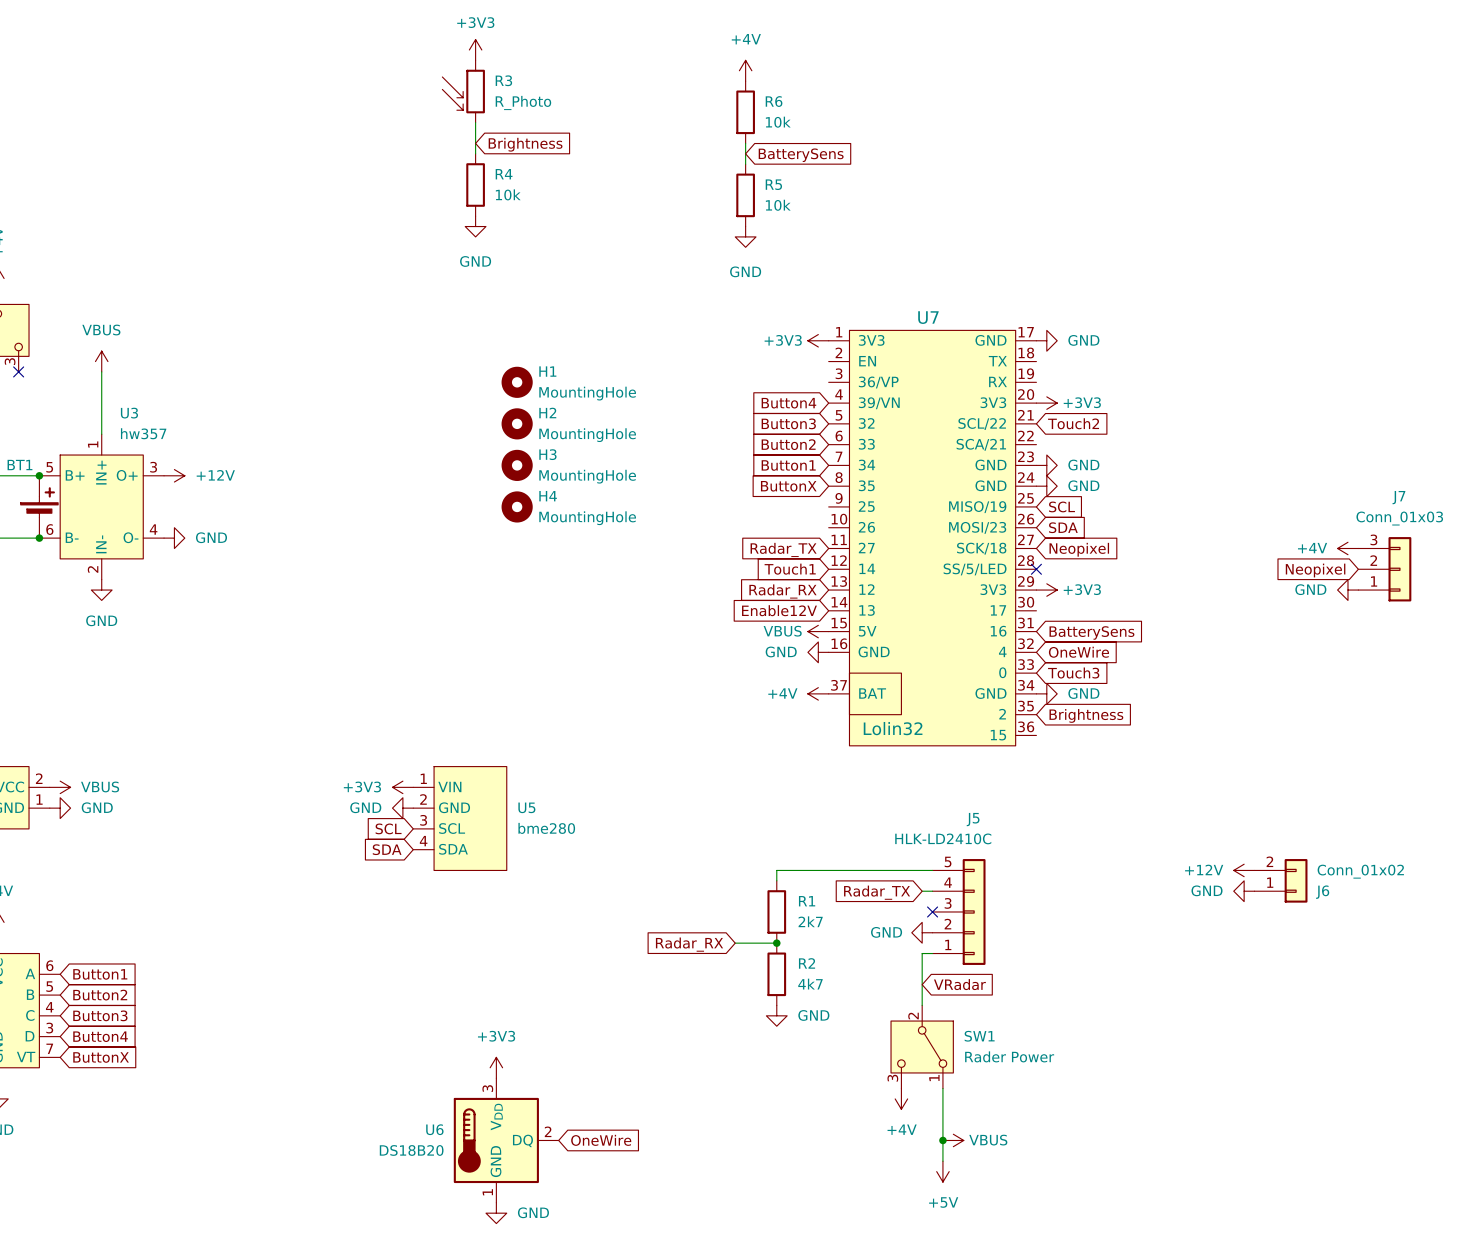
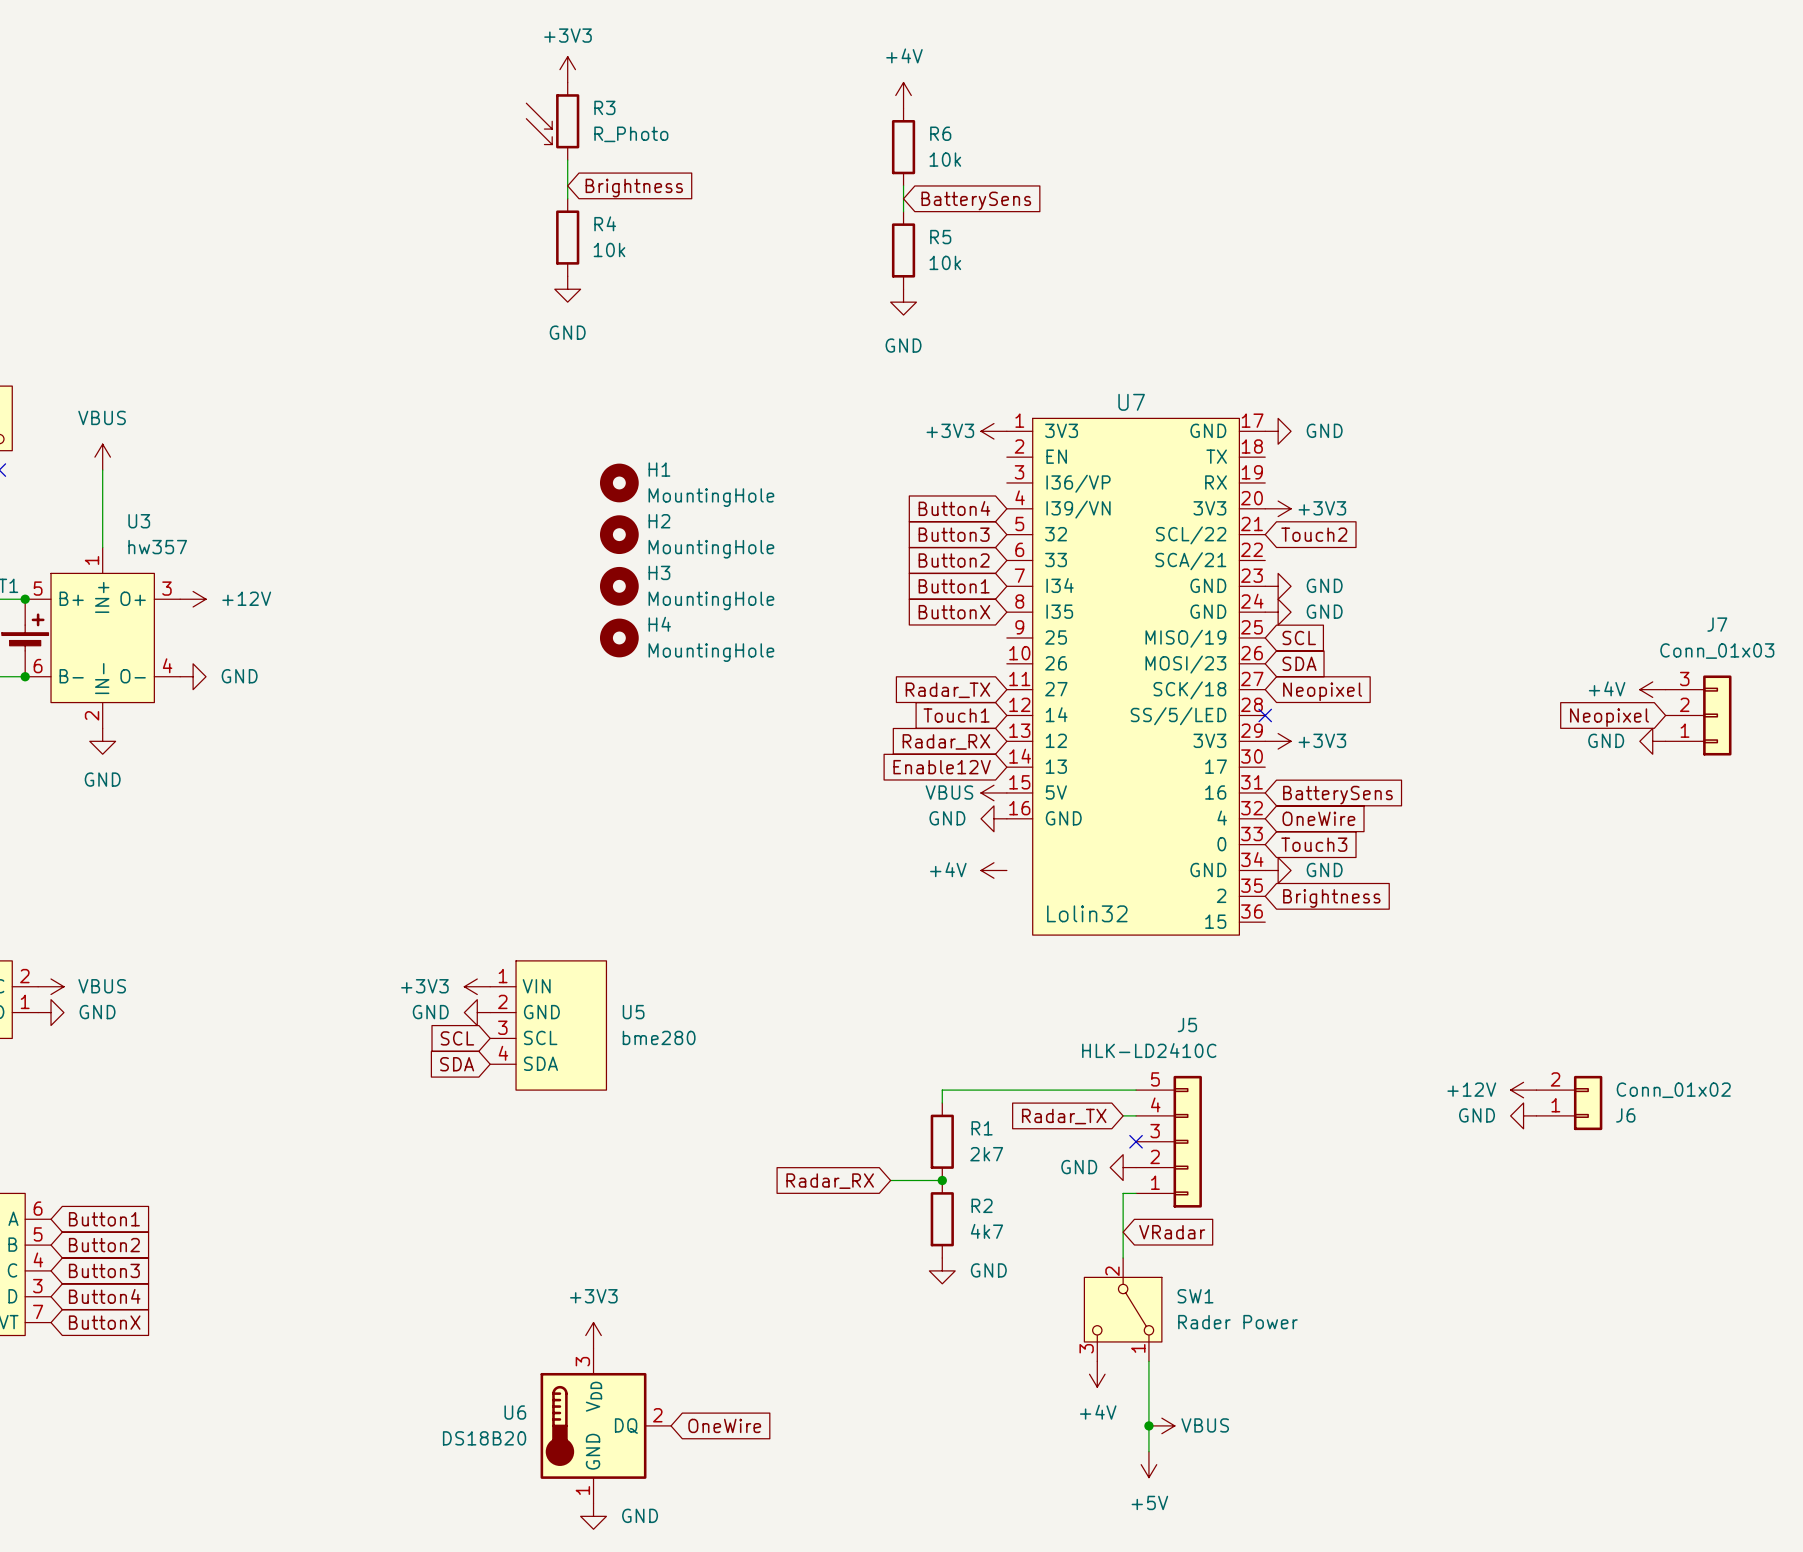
U7 symbol: [828, 330, 1037, 746] -> [1006, 418, 1266, 936]

